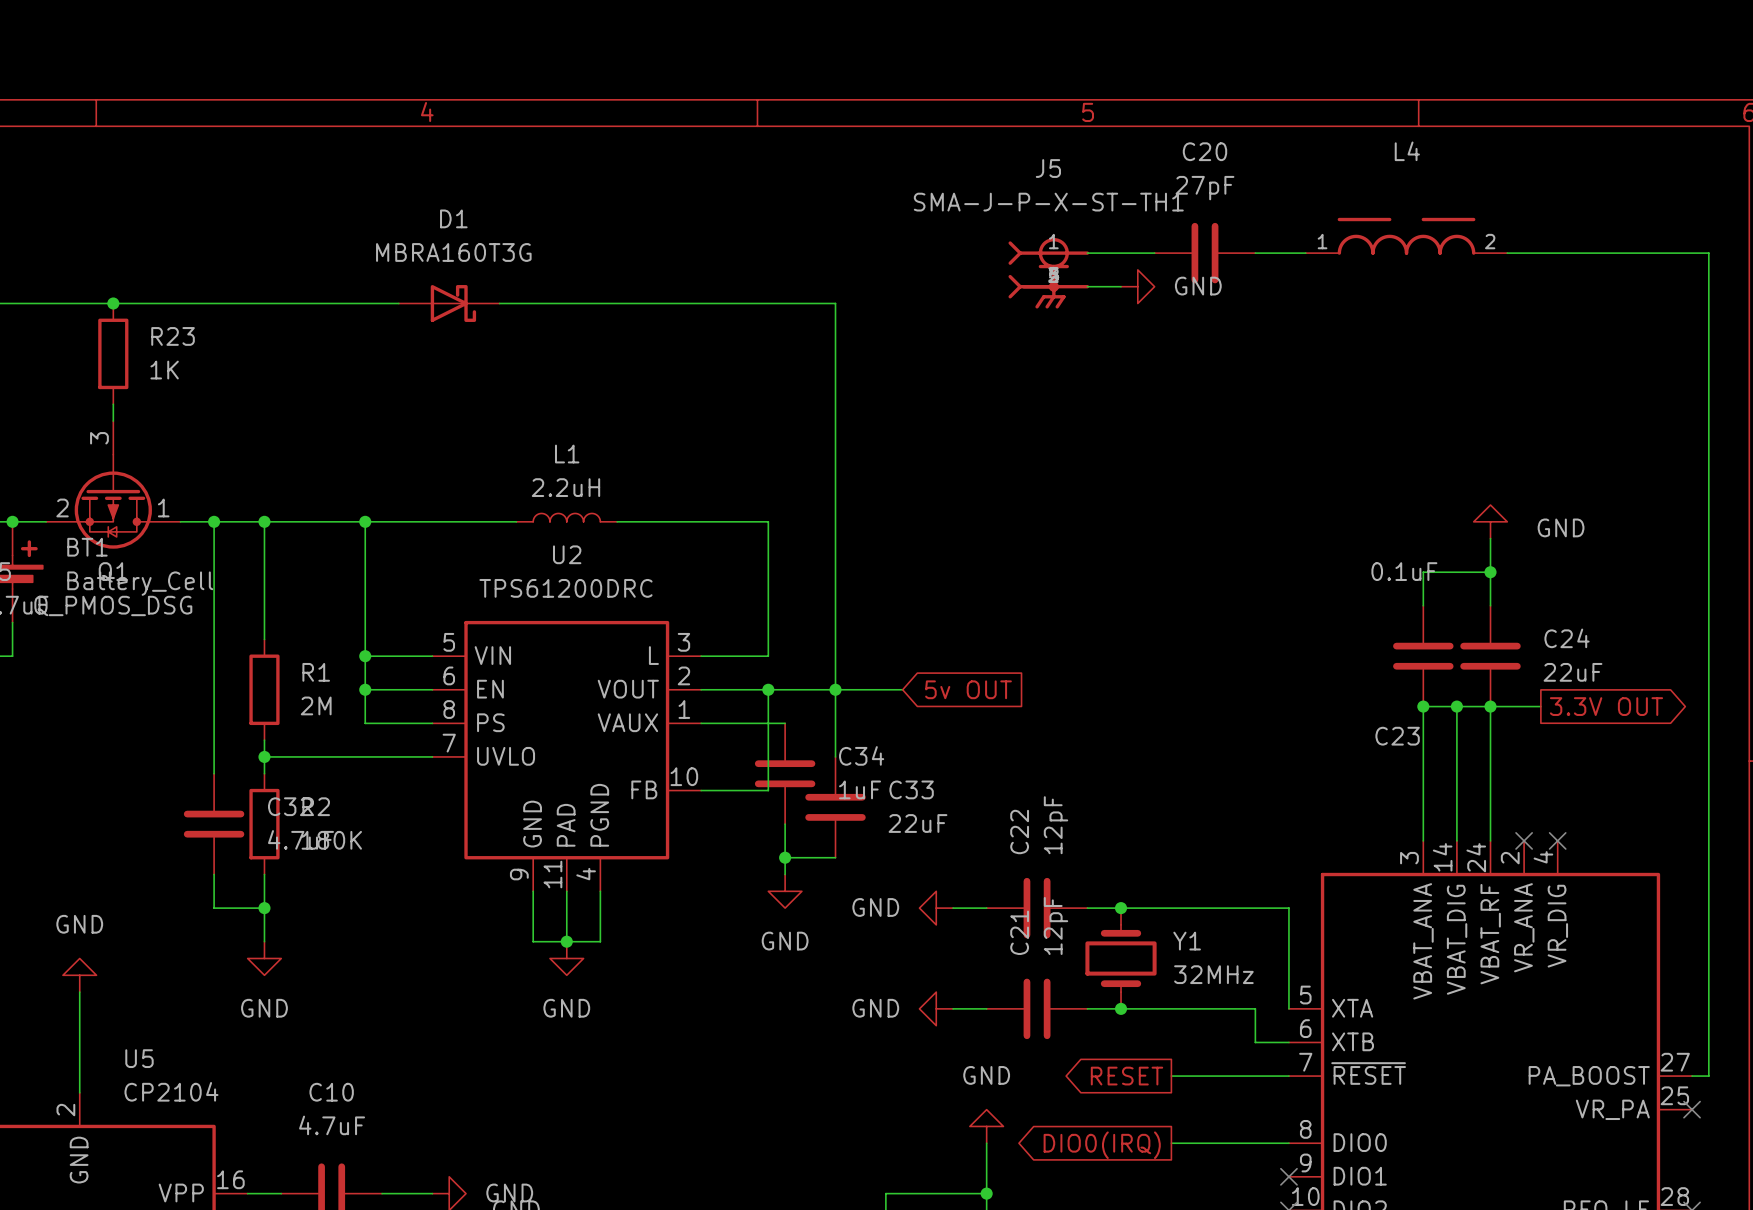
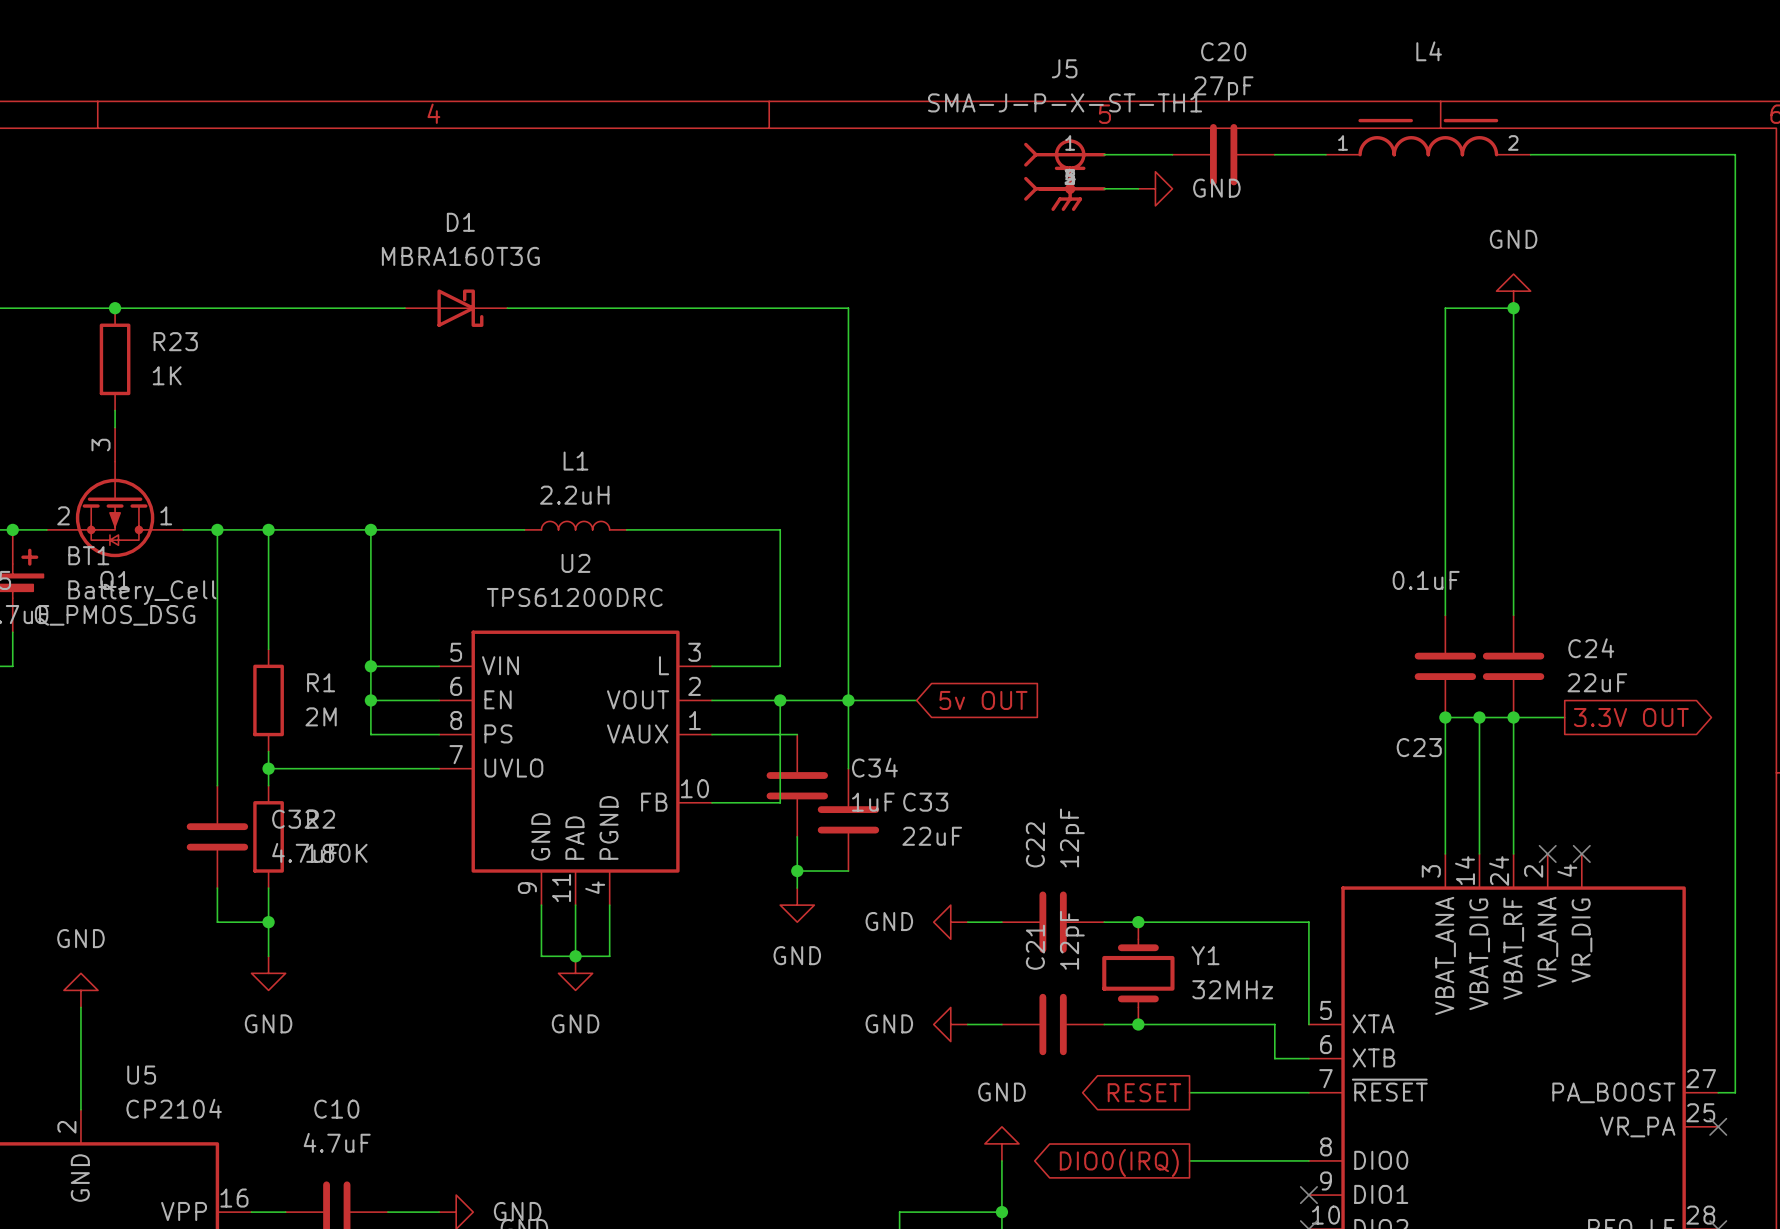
L4 position: (1406, 236) -> (1428, 137)
wire: (1087, 253) (1154, 253) -> (1104, 154) (1172, 154)
C20 position: (1204, 253) -> (1223, 154)
wire: (1255, 253) (1305, 253) -> (1274, 154) (1325, 154)
wire: (1507, 253) (1708, 253) -> (1530, 154) (1735, 154) (1735, 257)
J5 position: (1048, 273) -> (1065, 175)
wire: (1087, 286) (1121, 286) -> (1104, 188) (1138, 188)
power symbol position: GND (1137, 286) -> GND (1155, 188)
power symbol: none -> GND (1513, 291)
junction: none -> (1513, 308)
power symbol: GND (1490, 521) -> none
wire: (1423, 572) (1490, 572) -> (1445, 581) (1445, 308) (1513, 308) (1513, 546)
junction: (1490, 572) -> none

